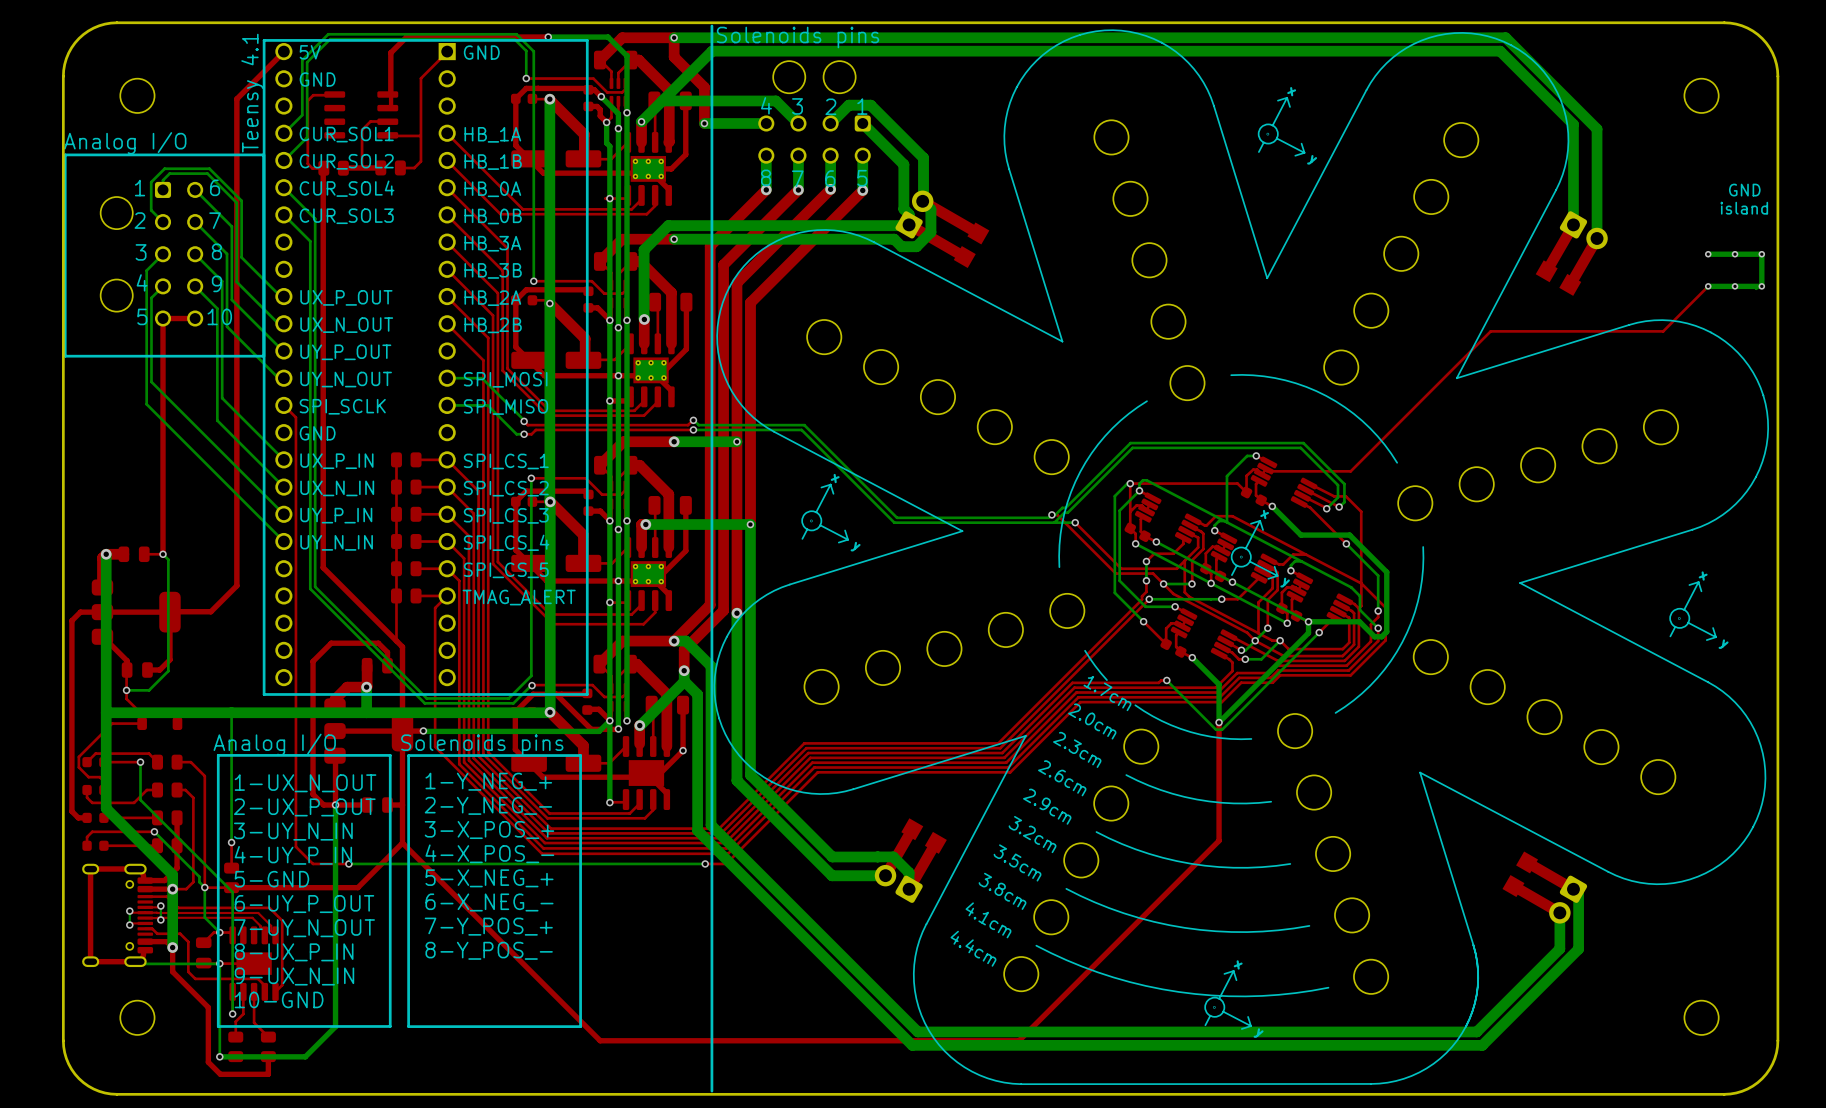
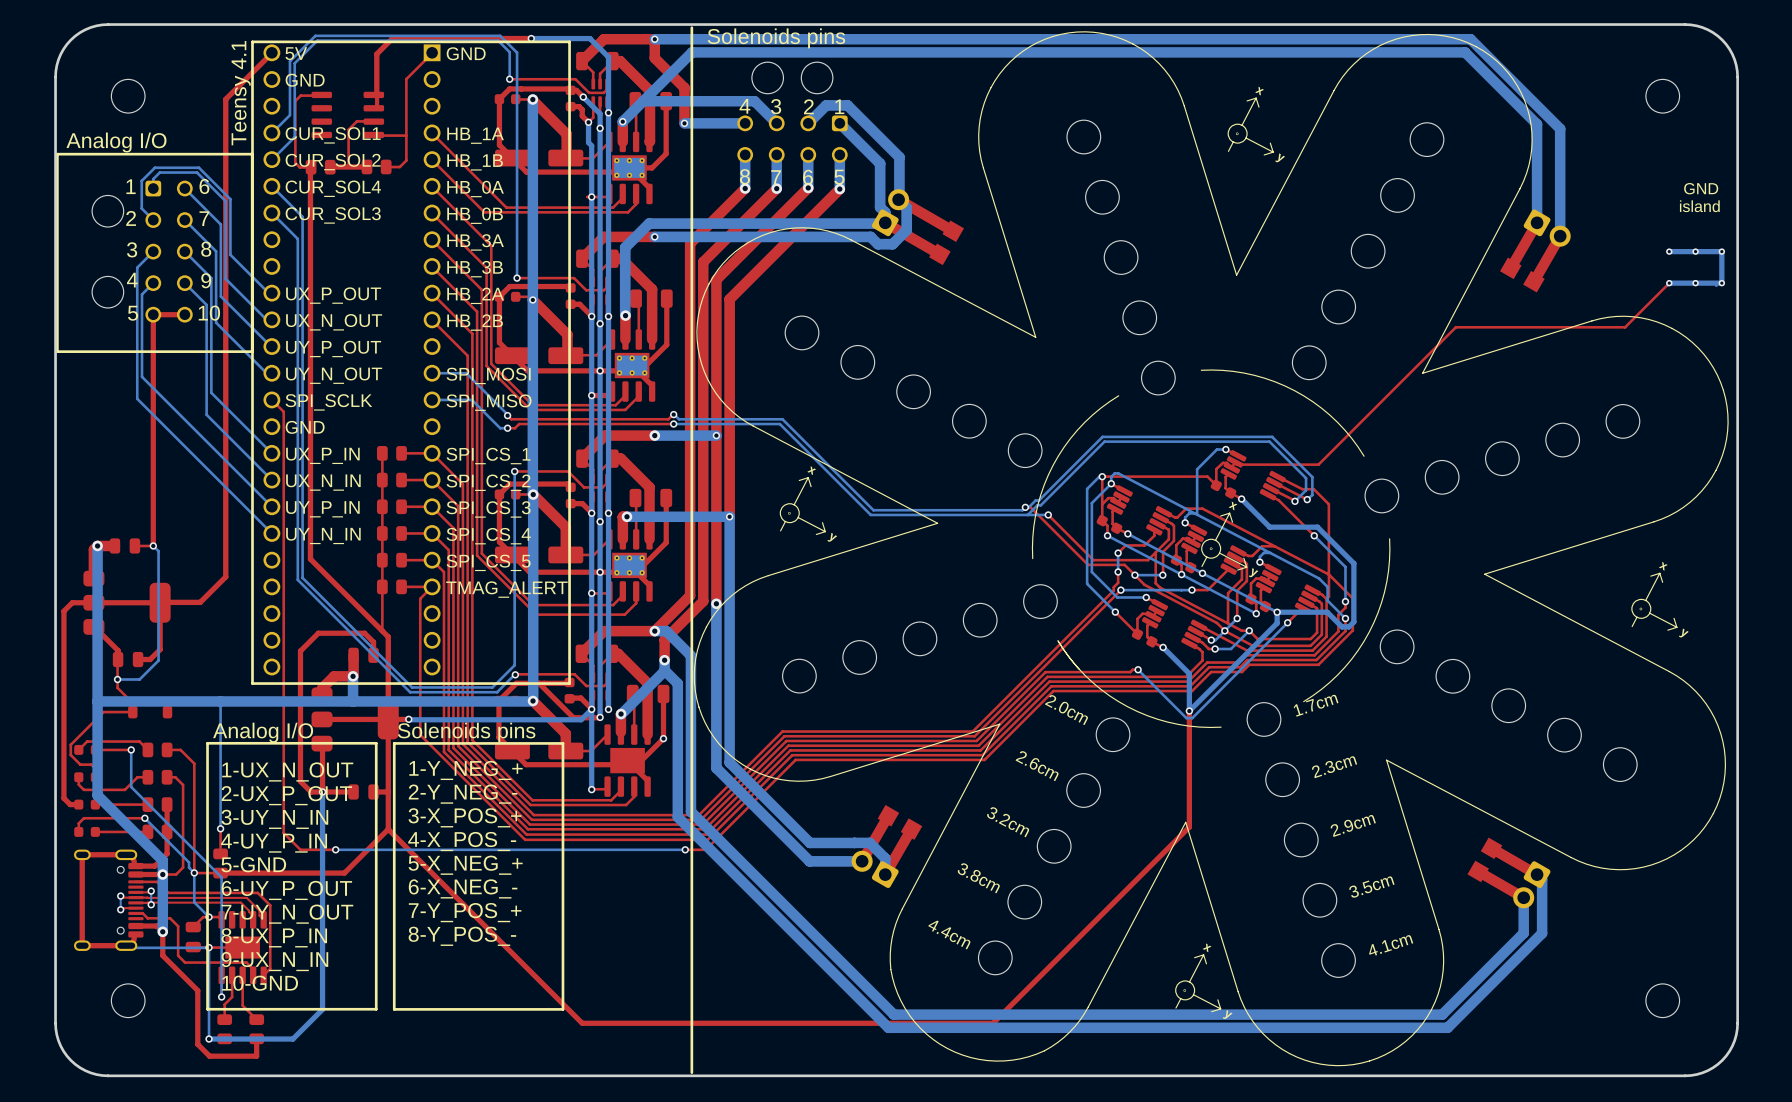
text rotation: 0° (1107, 693) -> 48.1° counterclockwise (1316, 705)
text position: 1.7cm (1107, 693) -> 1.7cm (1316, 705)
line: (1135, 705) (1161, 720) (1190, 732) (1220, 738) (1251, 738) -> (1058, 641) (1077, 667) (1092, 682) (1127, 706) (1147, 715) (1178, 724) (1221, 727)
text rotation: 0° (1092, 721) -> 2.4° counterclockwise (1066, 710)
text: 2.3cm (1077, 749) -> none
line: (1126, 775) (1160, 789) (1196, 799) (1233, 803) (1271, 801) -> none
text rotation: 0° (1062, 778) -> 2.4° counterclockwise (1037, 766)
text: none -> 2.3cm (1334, 767)
text: 2.9cm (1047, 806) -> none
line: (1096, 832) (1149, 853) (1190, 863) (1247, 867) (1290, 863) -> none
text rotation: 0° (1032, 834) -> 2.4° counterclockwise (1008, 822)
text: none -> 2.9cm (1353, 825)
text: 3.5cm (1017, 862) -> none
line: (1066, 888) (1123, 913) (1184, 927) (1247, 932) (1309, 925) -> none
text rotation: 0° (1002, 891) -> 2.4° counterclockwise (978, 878)
text: none -> 3.5cm (1371, 887)
text: 4.1cm (988, 920) -> none
line: (926, 924) (915, 956) (913, 982) (918, 1007) (929, 1030) (950, 1056) (971, 1071) (995, 1080) (1021, 1084) (1370, 1083) (1403, 1078) (1419, 1072) (1440, 1058) (1452, 1046) (1466, 1026) (1472, 1010) (1477, 986) (1477, 969) (1473, 945) -> (902, 908) (892, 938) (890, 969) (901, 1001) (914, 1022) (940, 1044) (970, 1057) (1003, 1060) (1028, 1056) (1044, 1050) (1057, 1042) (1075, 1026) (1084, 1013) (1185, 822) (1240, 999) (1257, 1027) (1275, 1044) (1296, 1057) (1320, 1064) (1337, 1065) (1361, 1063) (1384, 1054) (1405, 1041) (1422, 1023) (1431, 1009)
line: (1036, 945) (1097, 972) (1145, 985) (1178, 991) (1245, 996) (1295, 993) (1328, 987) -> none
text rotation: 0° (973, 948) -> 2.4° counterclockwise (949, 935)
text: none -> 4.1cm (1391, 945)

